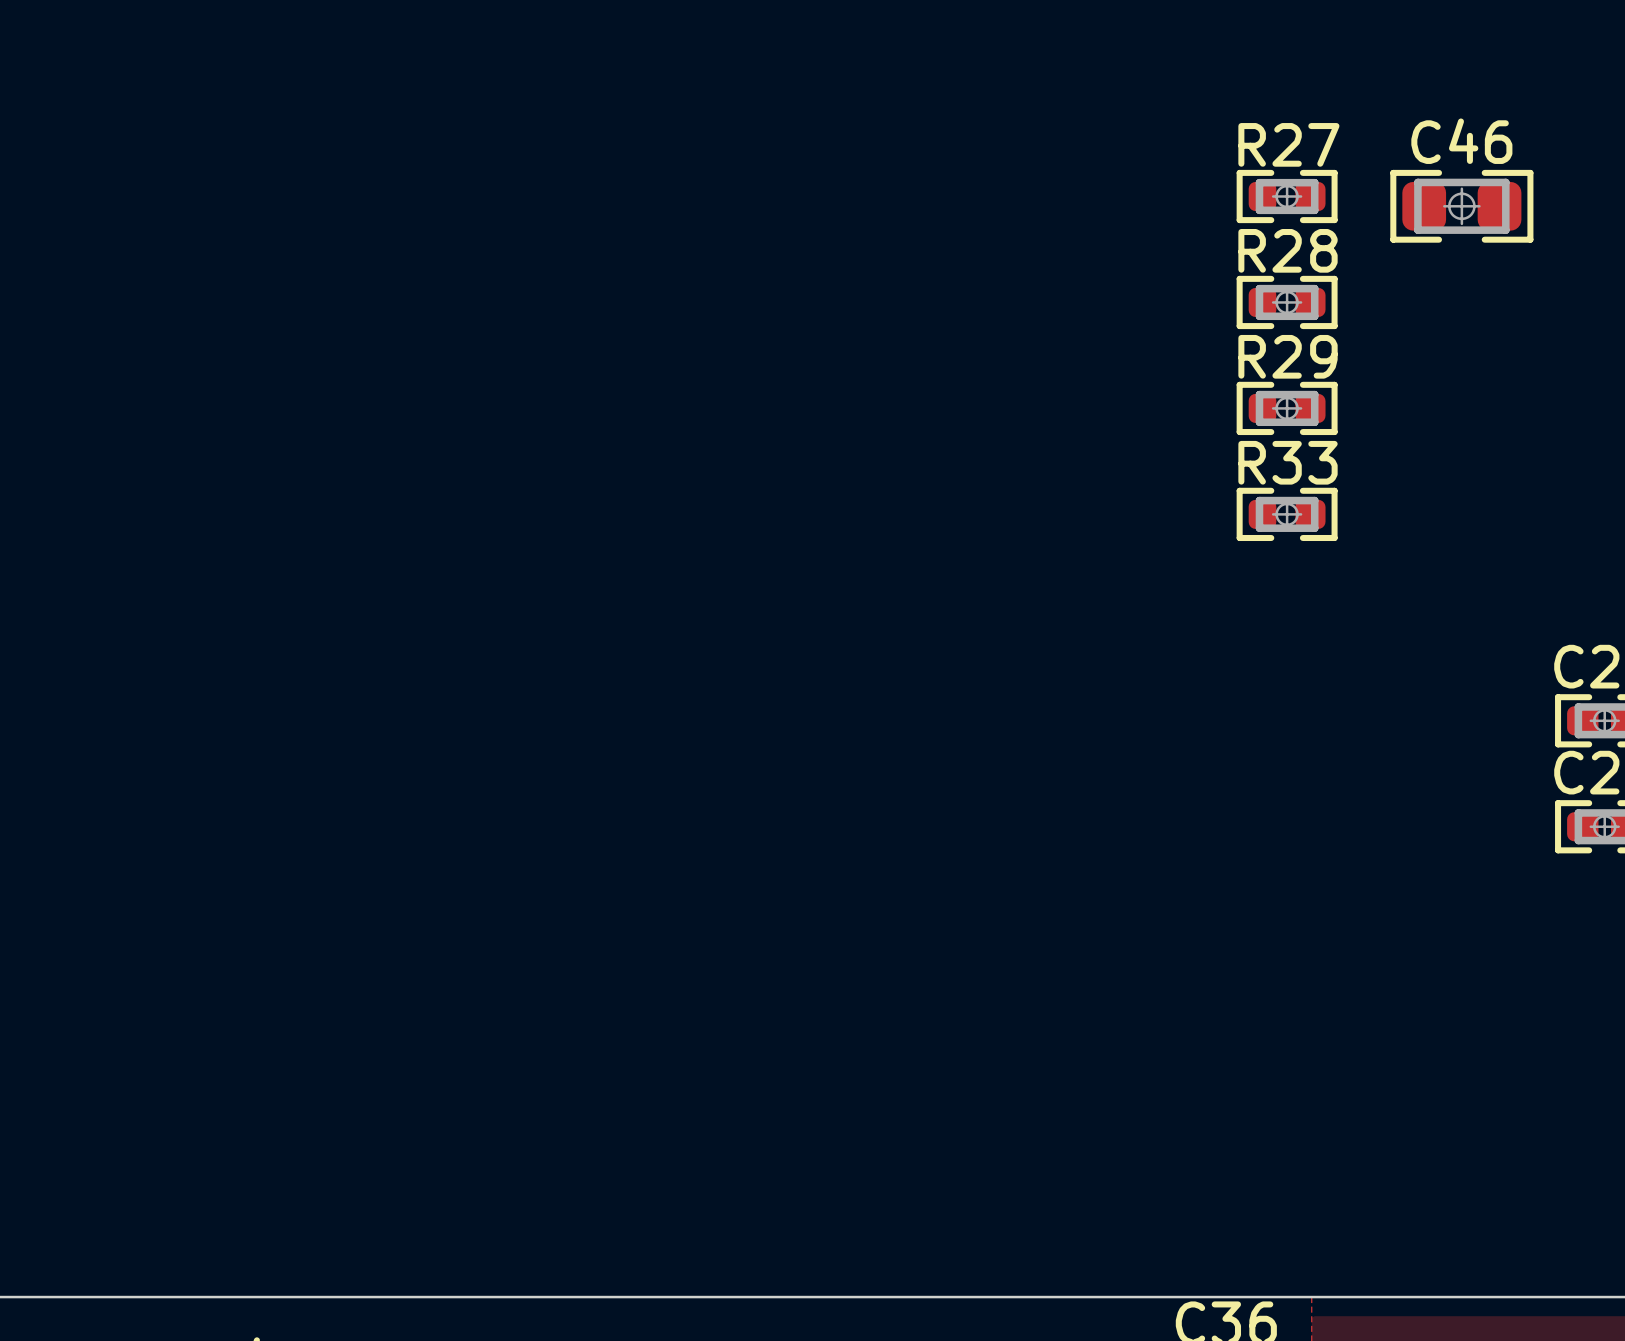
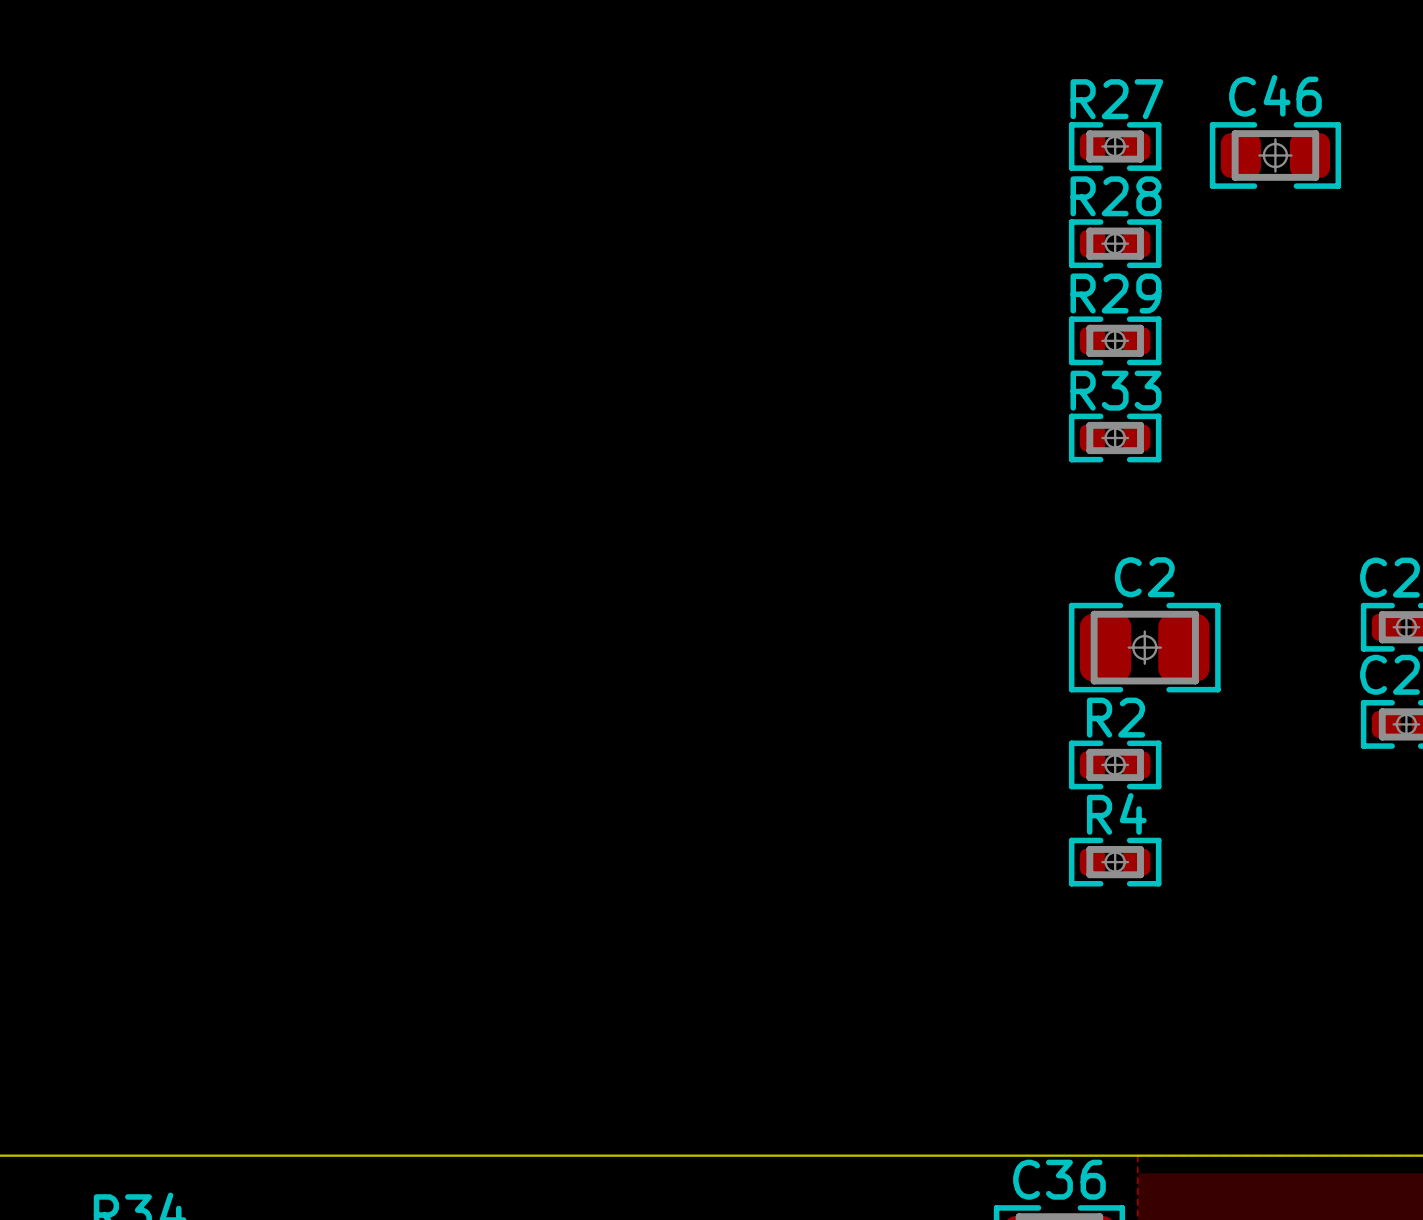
C2: none -> (1144, 647)
R2: none -> (1115, 764)
R4: none -> (1115, 862)

